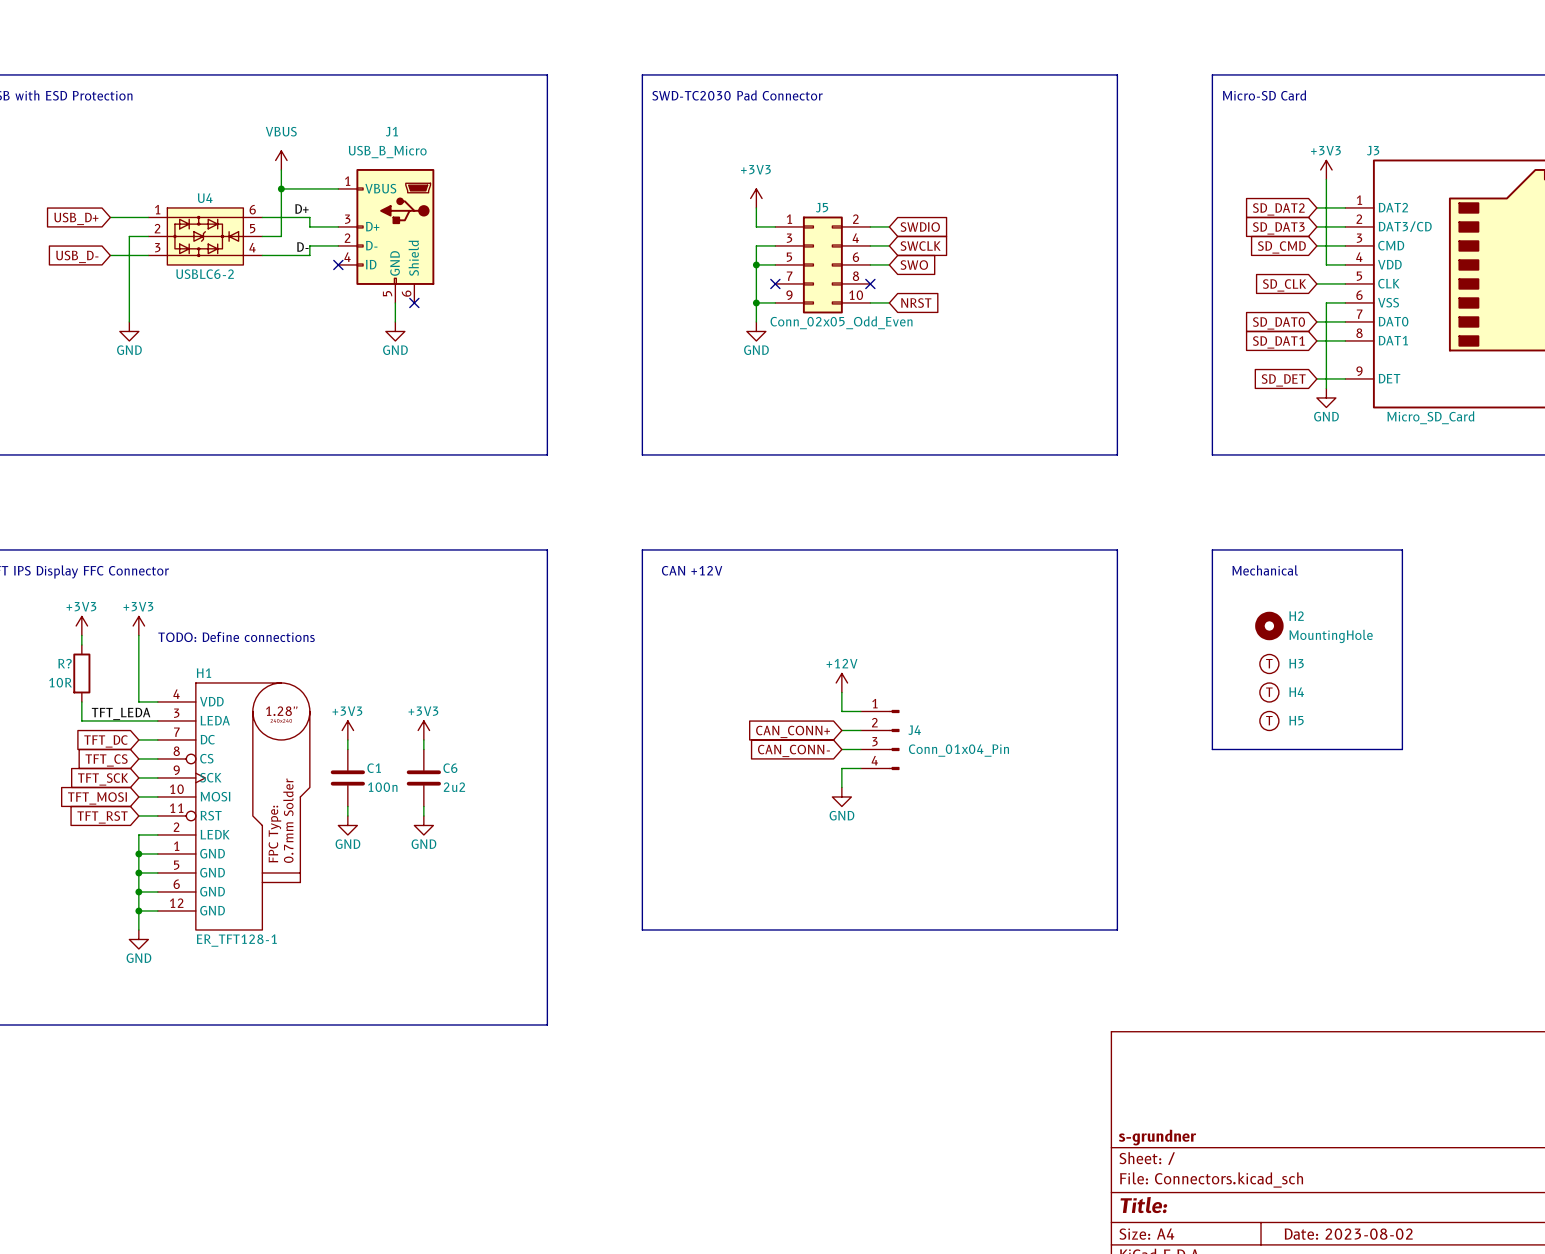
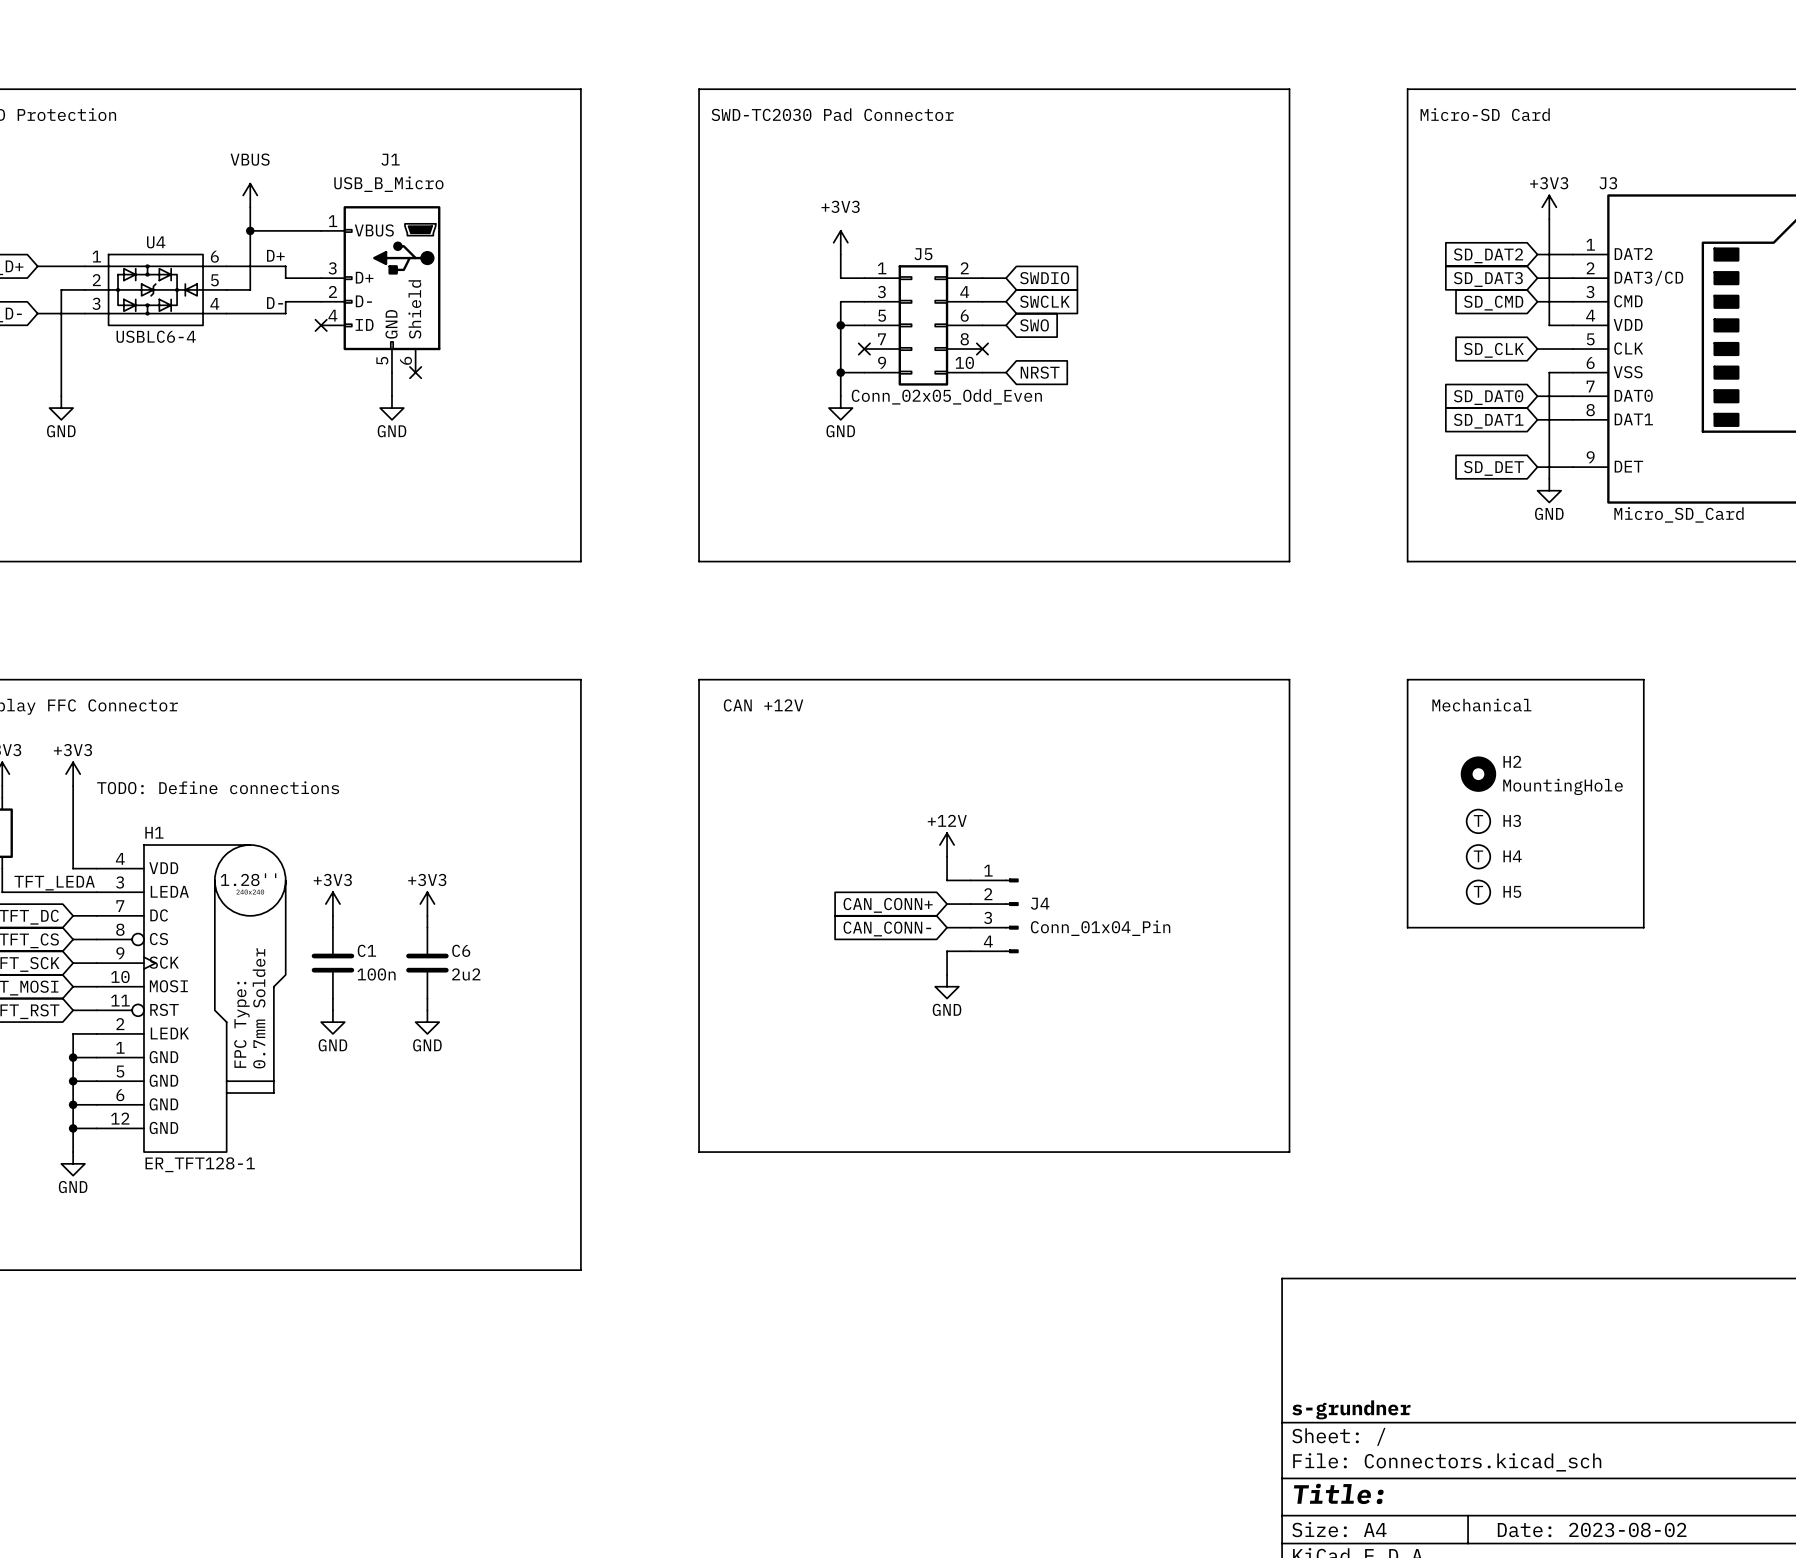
U4 value: USBLC6-2 (205, 274) -> USBLC6-4 (156, 336)

